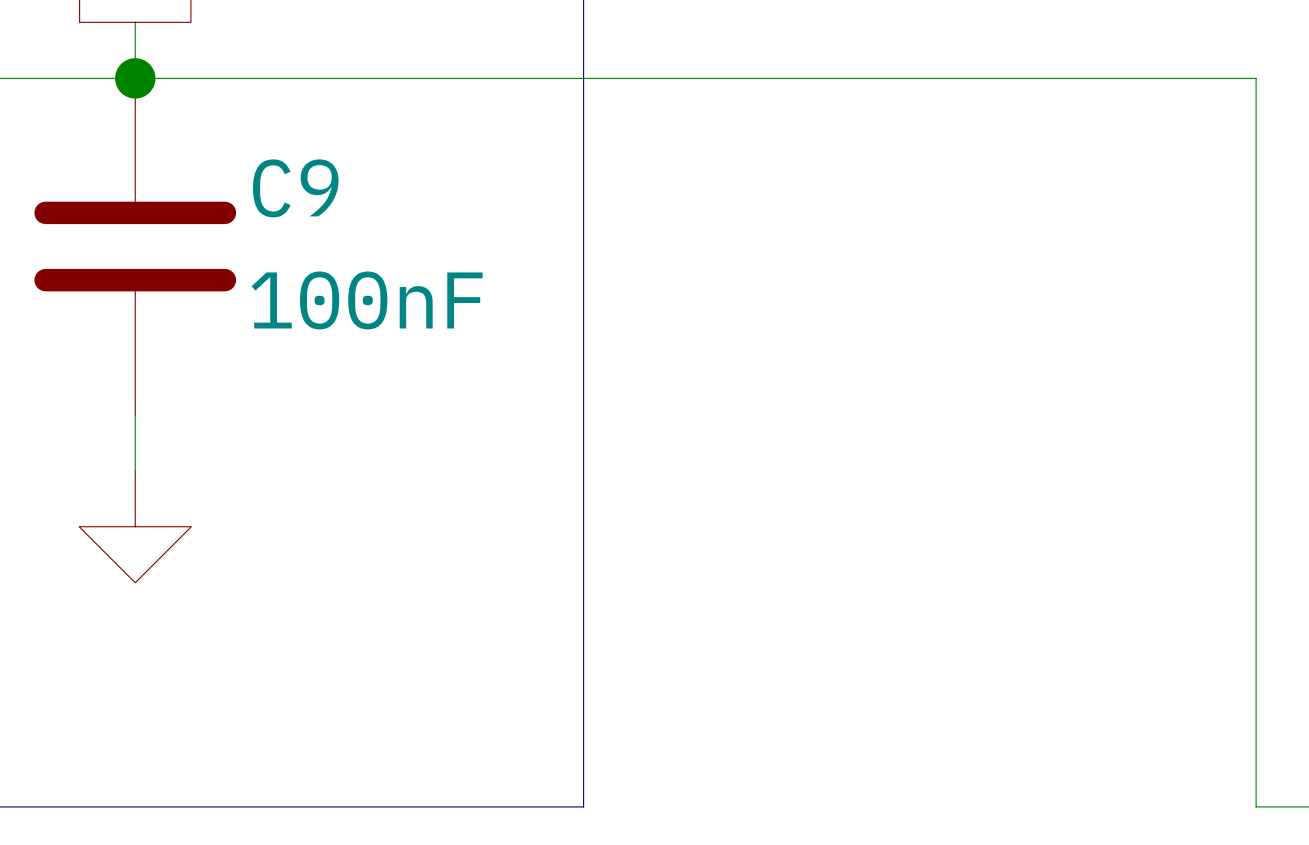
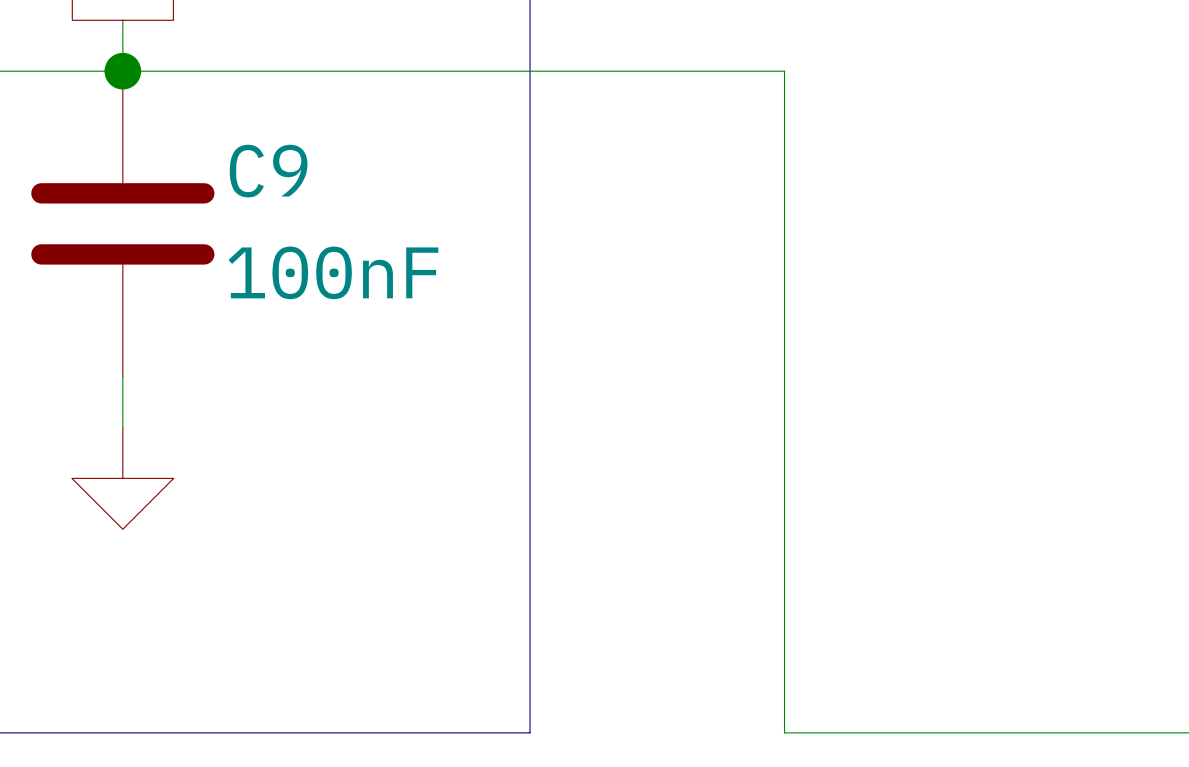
wire: (863, 78) (1256, 78) (1256, 806) -> (784, 71) (784, 732) (1140, 732)

